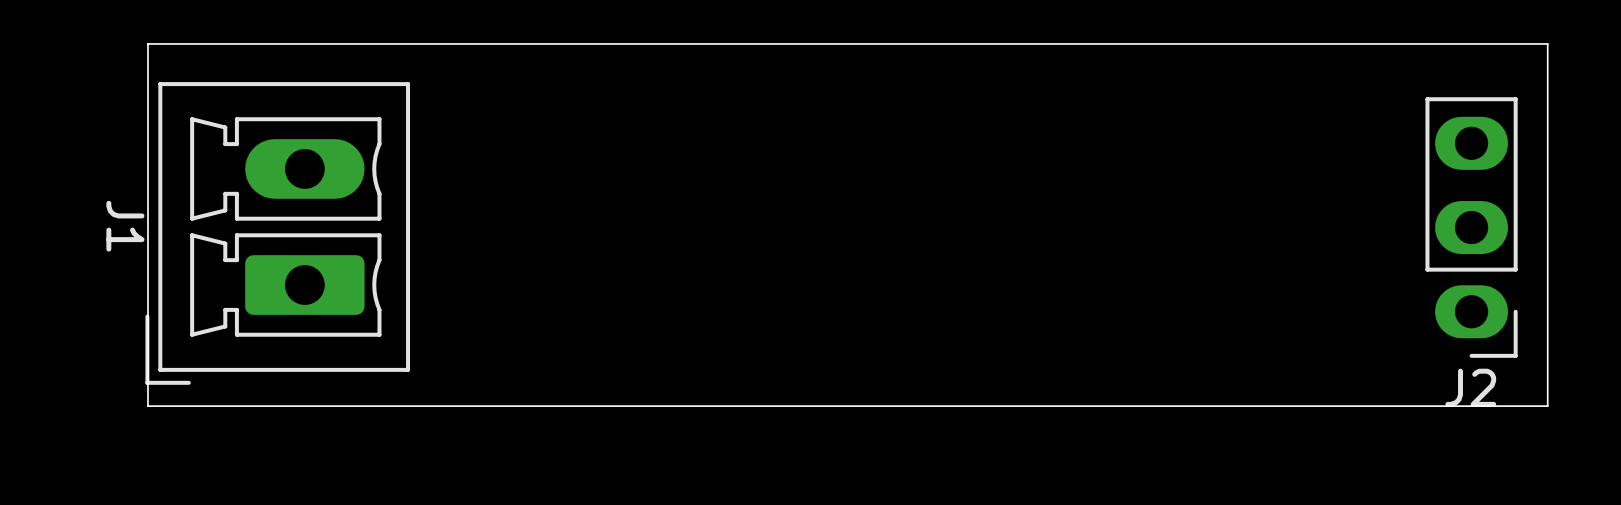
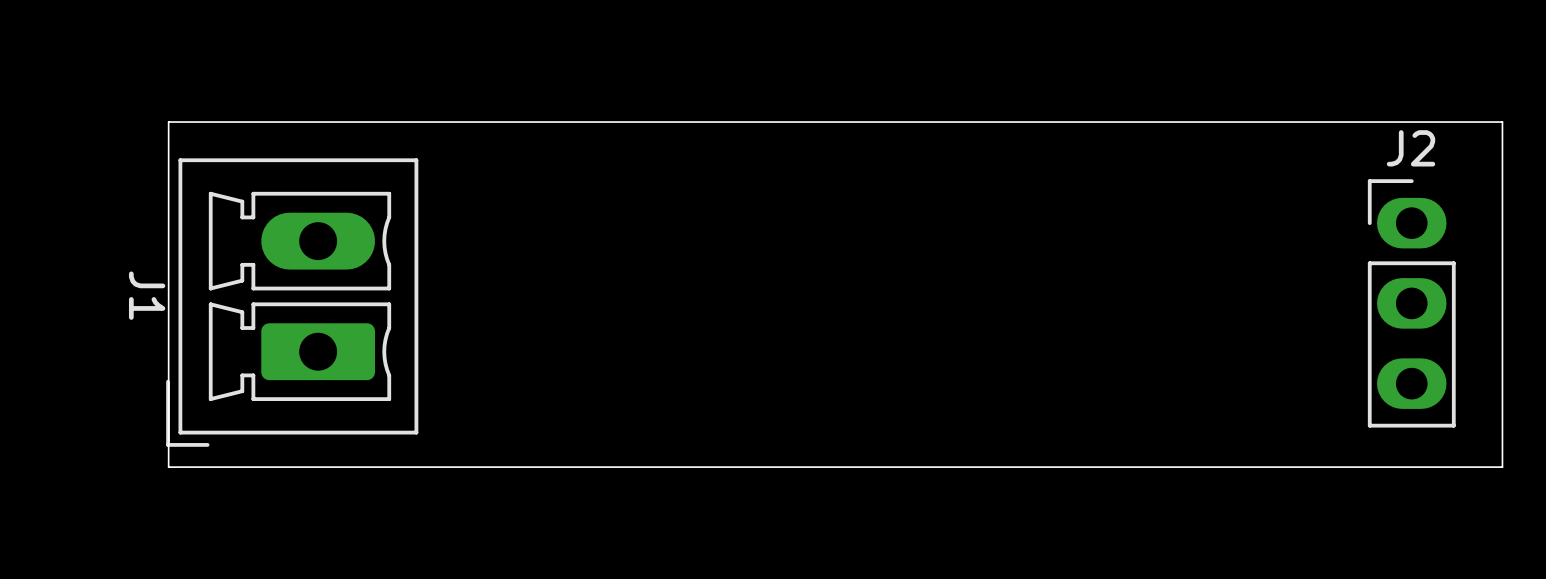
J2 rotation: 0° (1471, 227) -> 180° (1411, 303)

